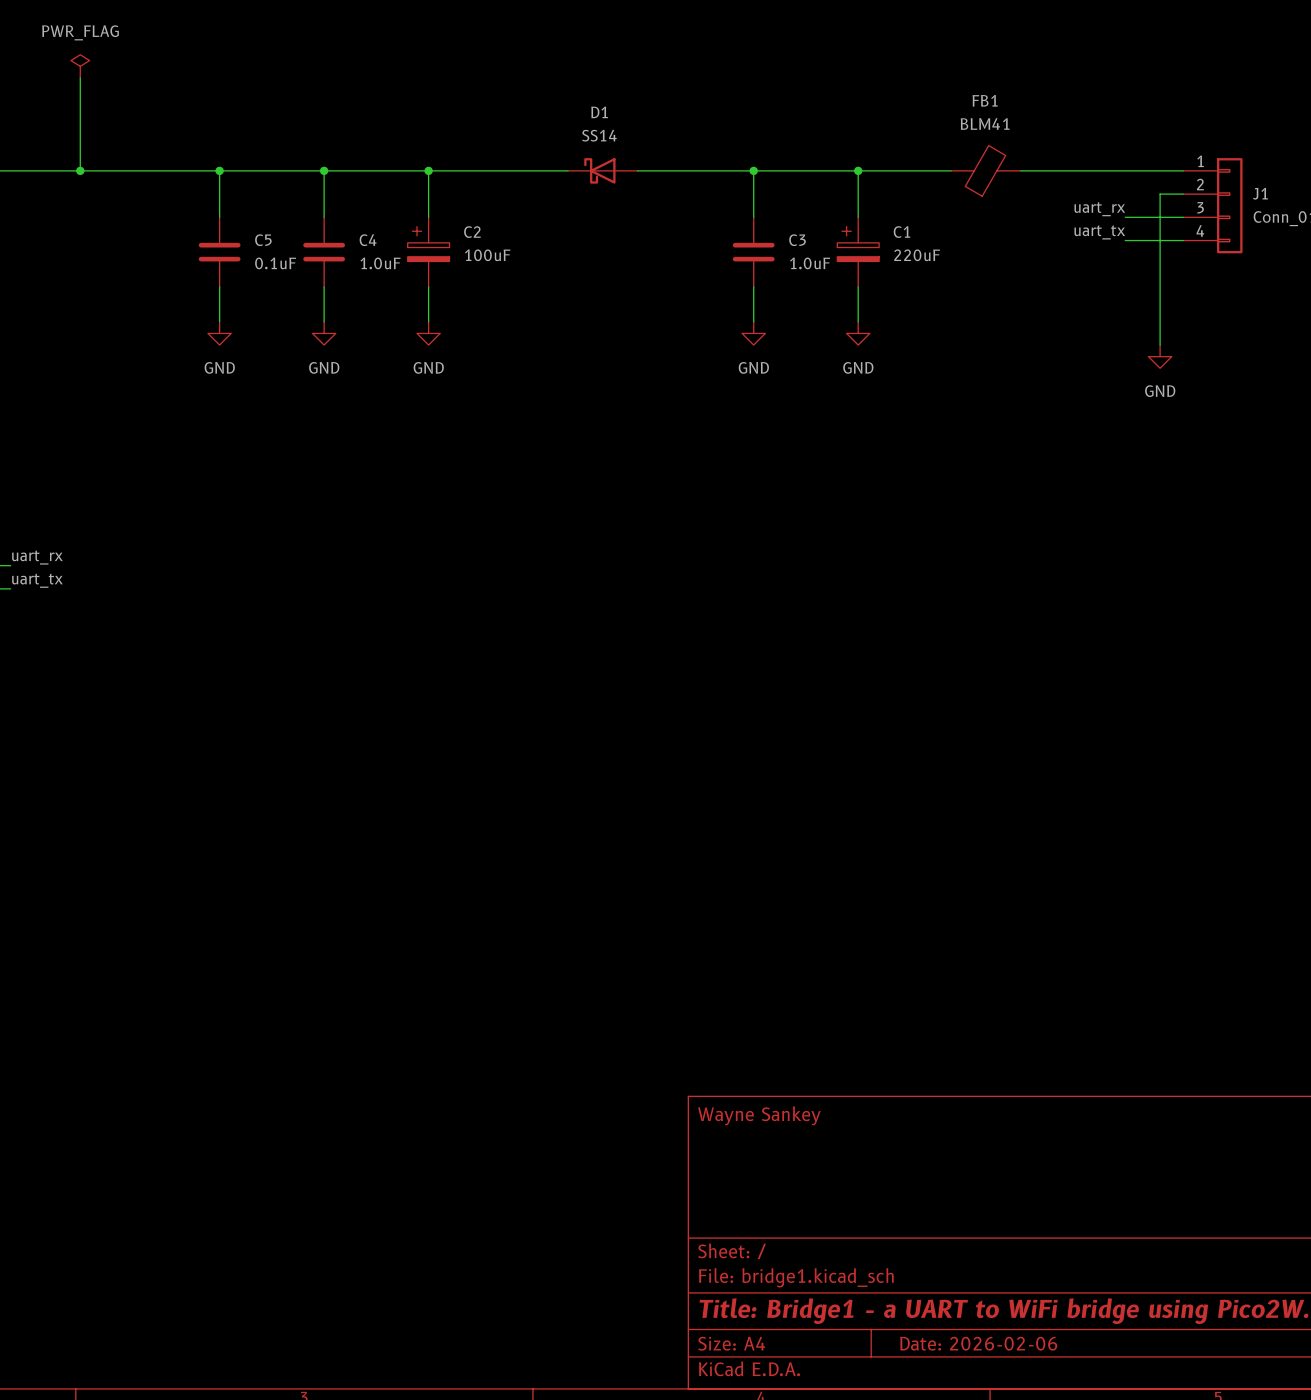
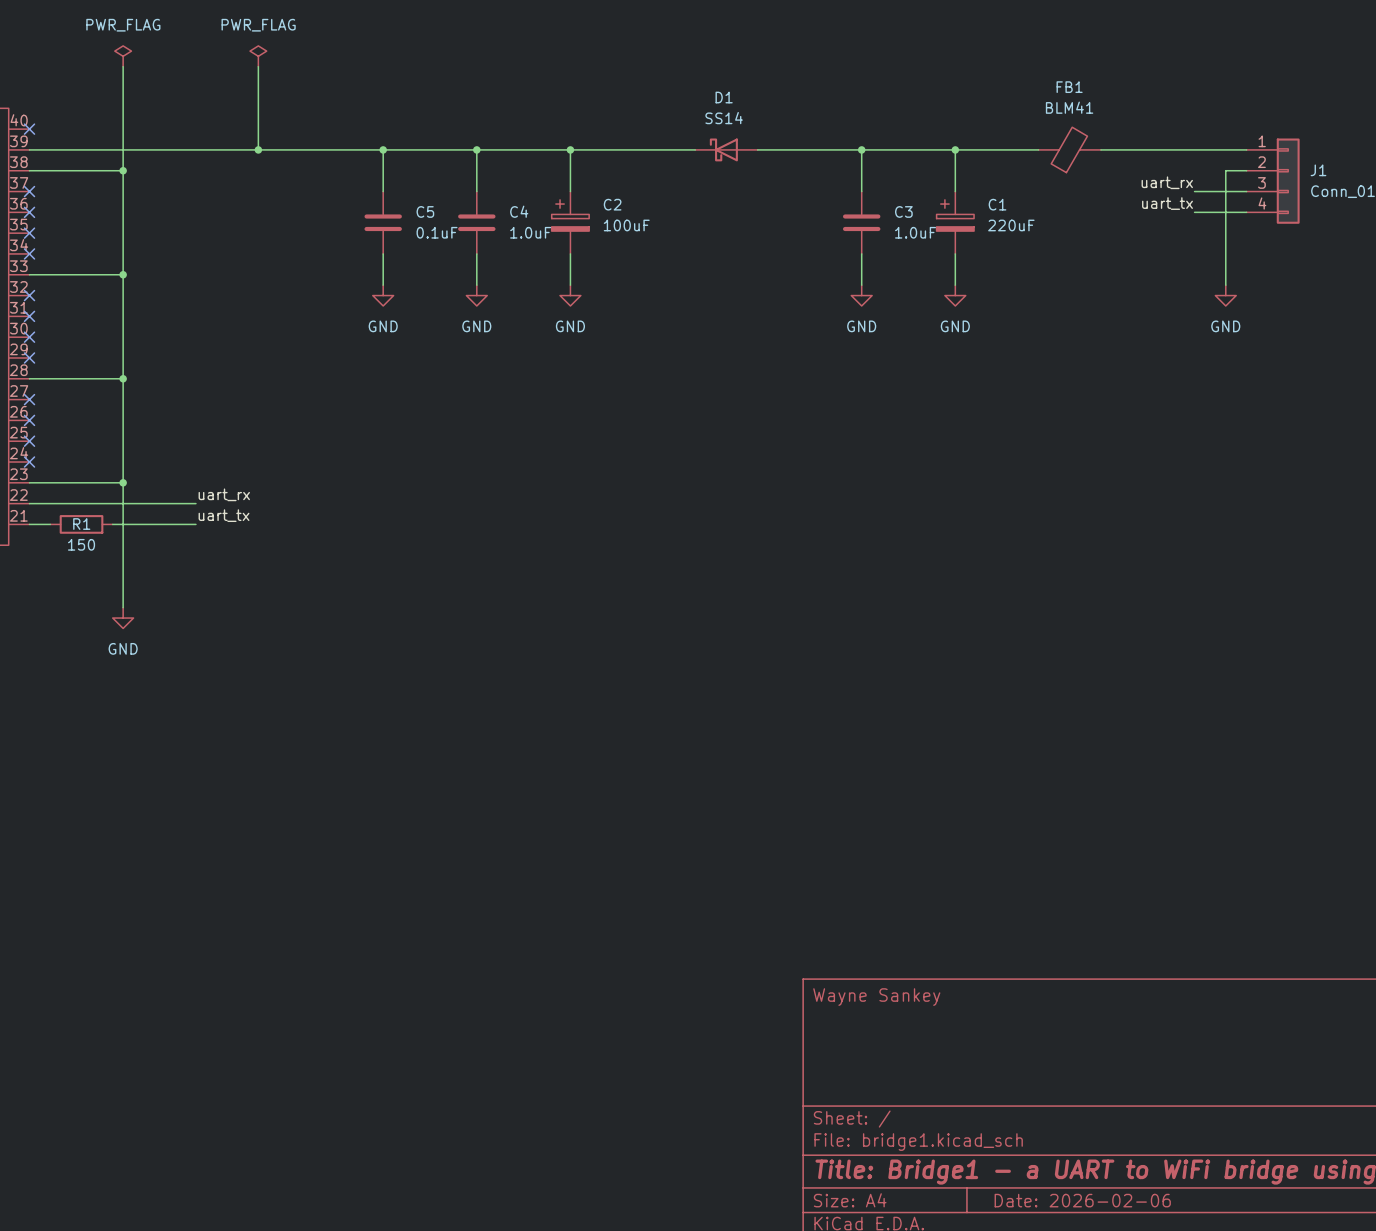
power symbol position: GND (1160, 356) -> GND (1225, 295)

